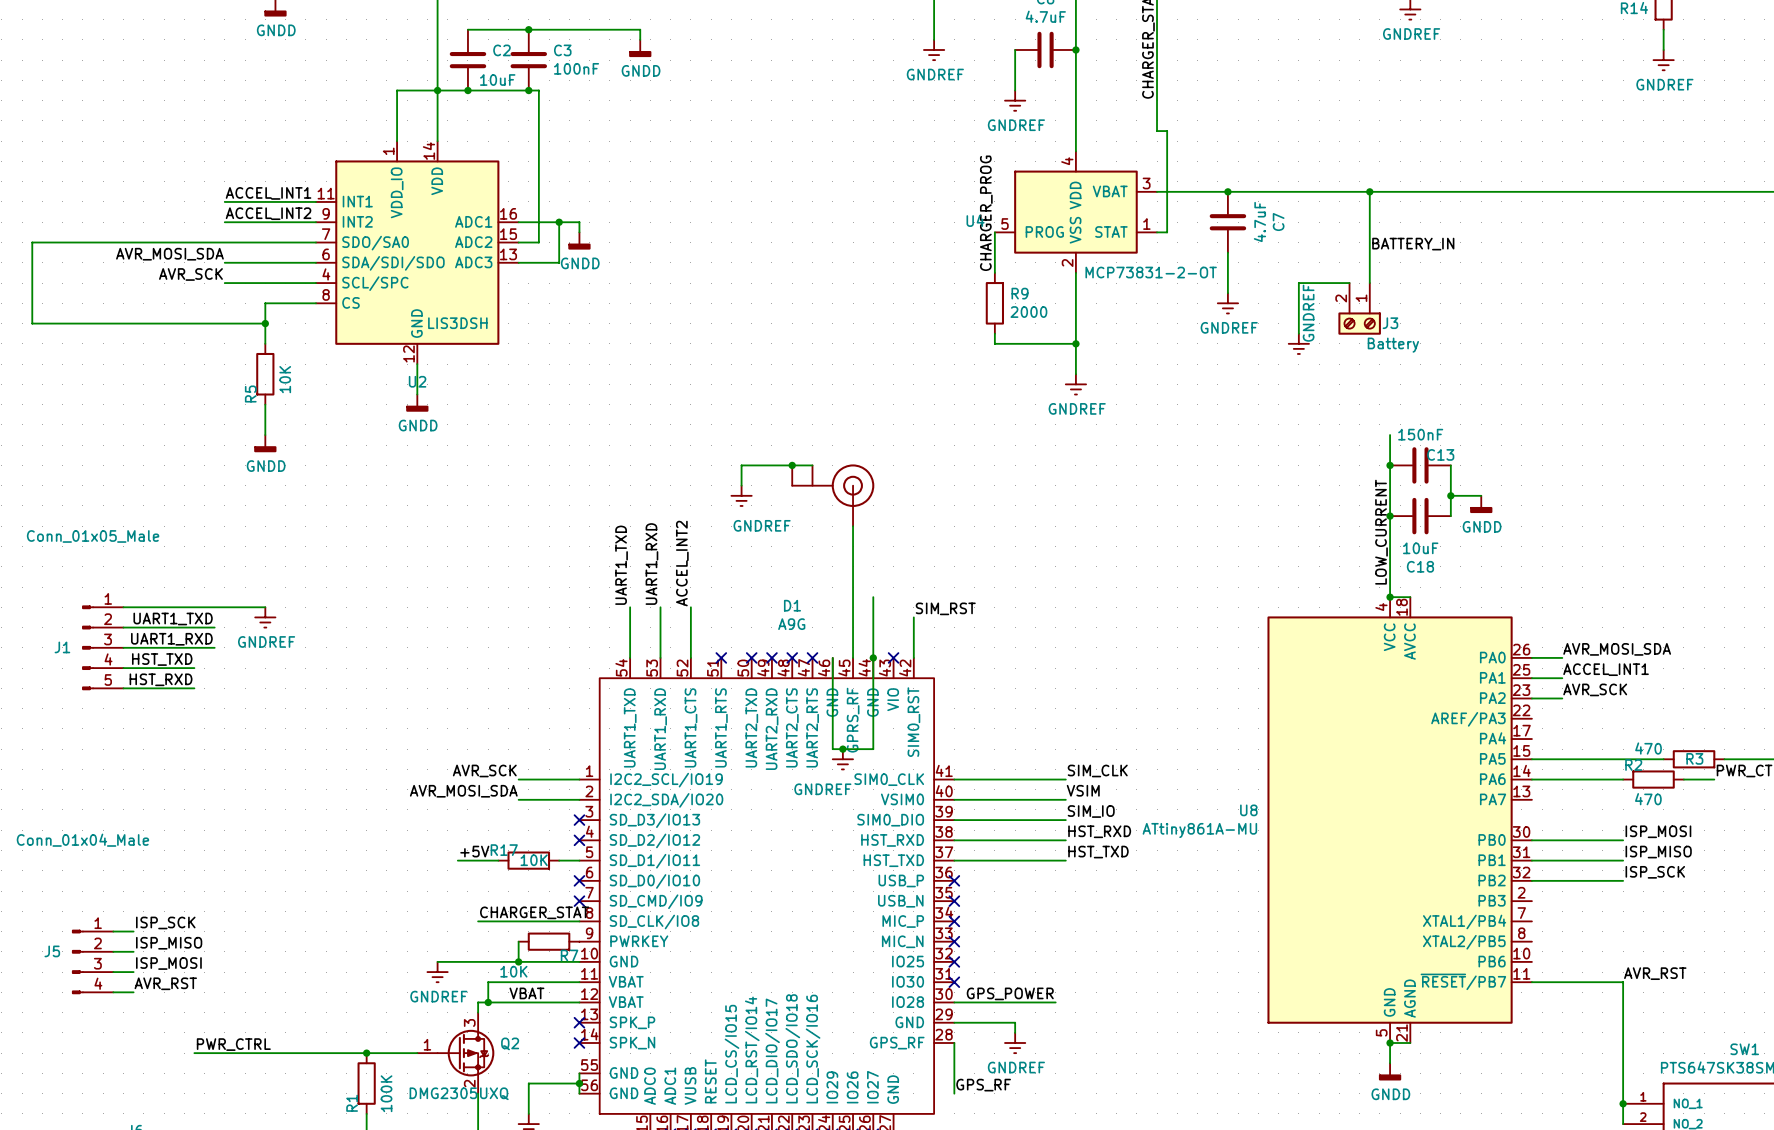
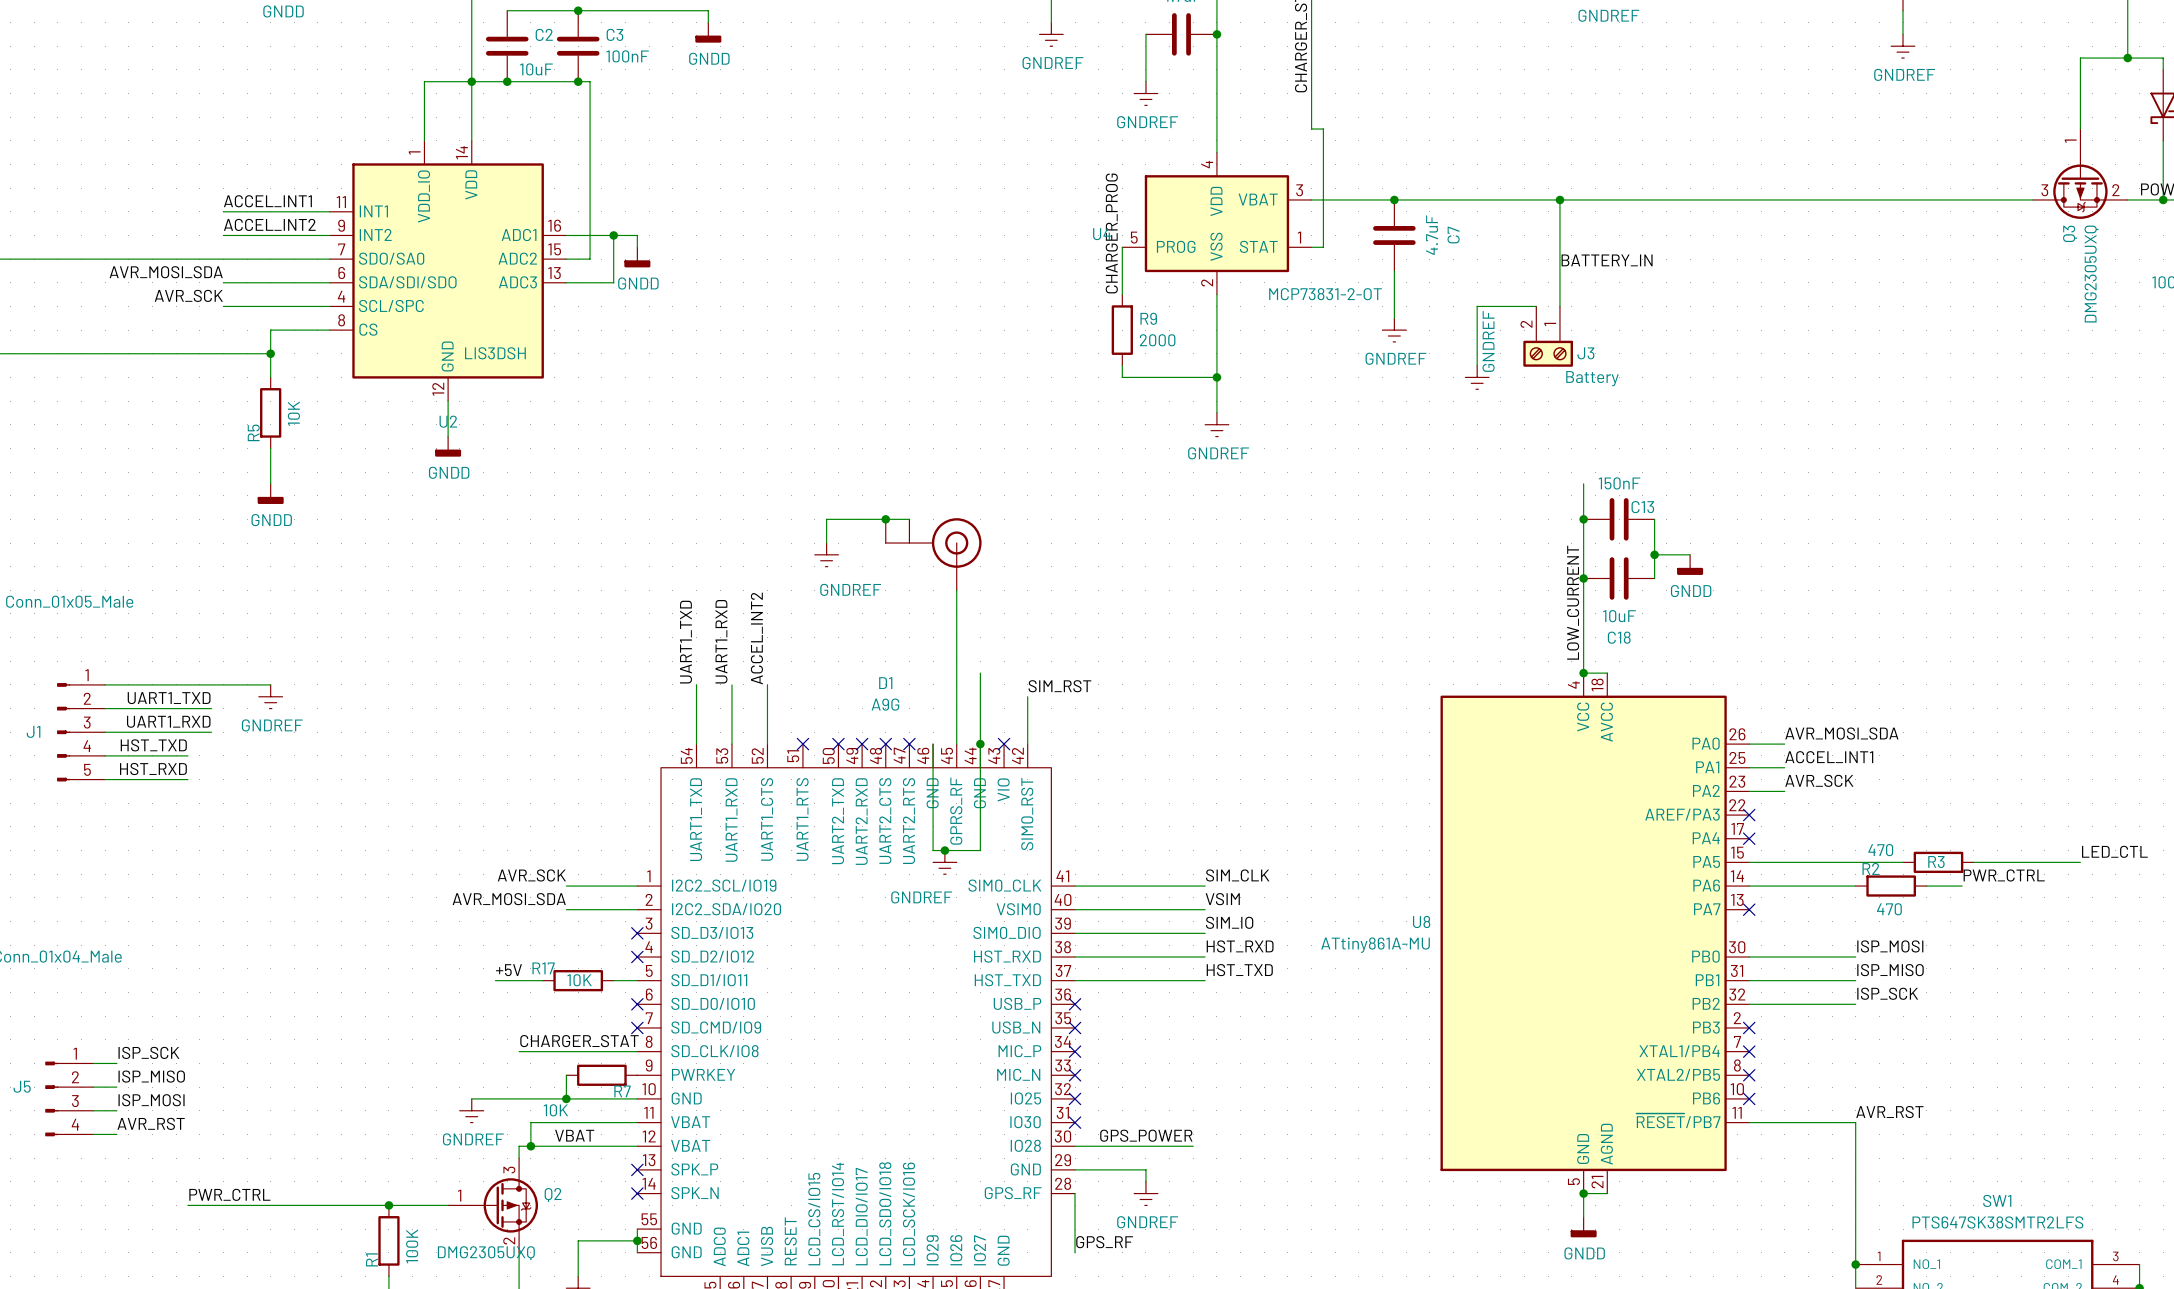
no-connect mark: none -> (1749, 815)
no-connect mark: none -> (1749, 838)
no-connect mark: none -> (1749, 909)
no-connect mark: none -> (1749, 1027)
no-connect mark: none -> (1749, 1051)
no-connect mark: none -> (1749, 1075)
no-connect mark: none -> (1749, 1098)

